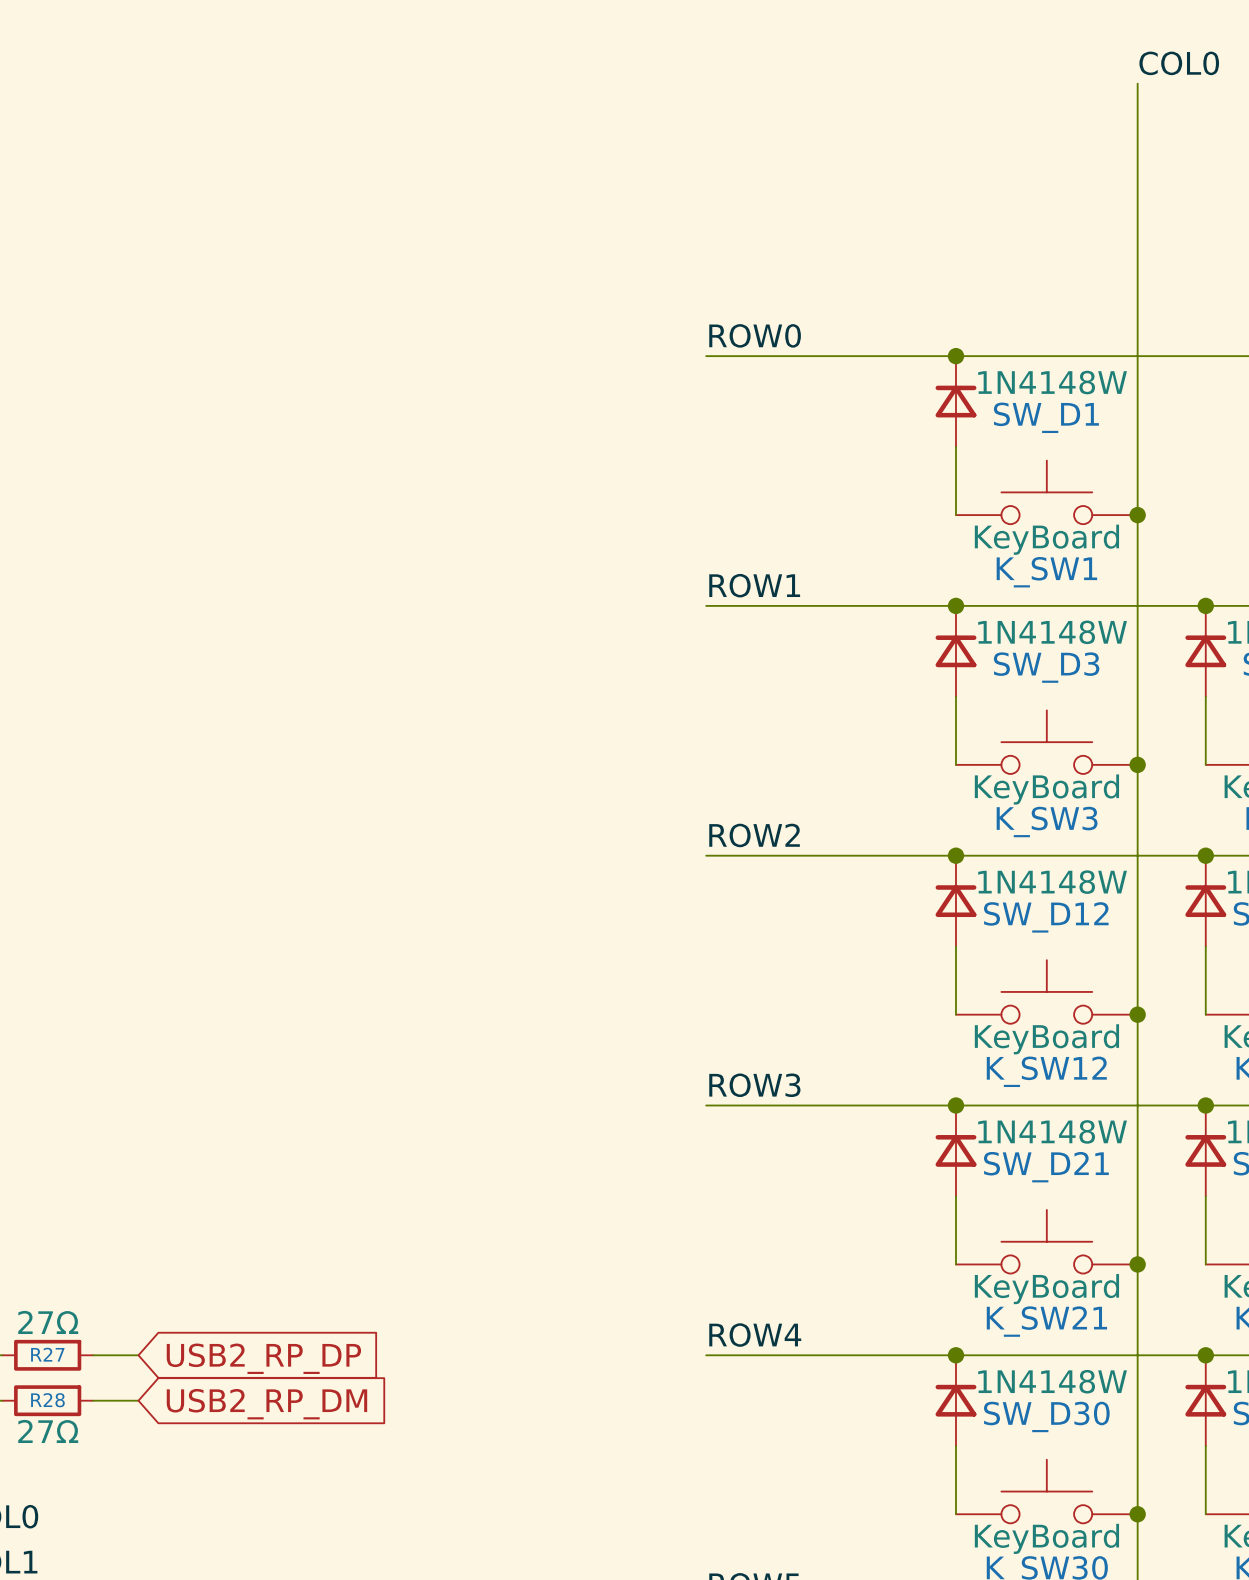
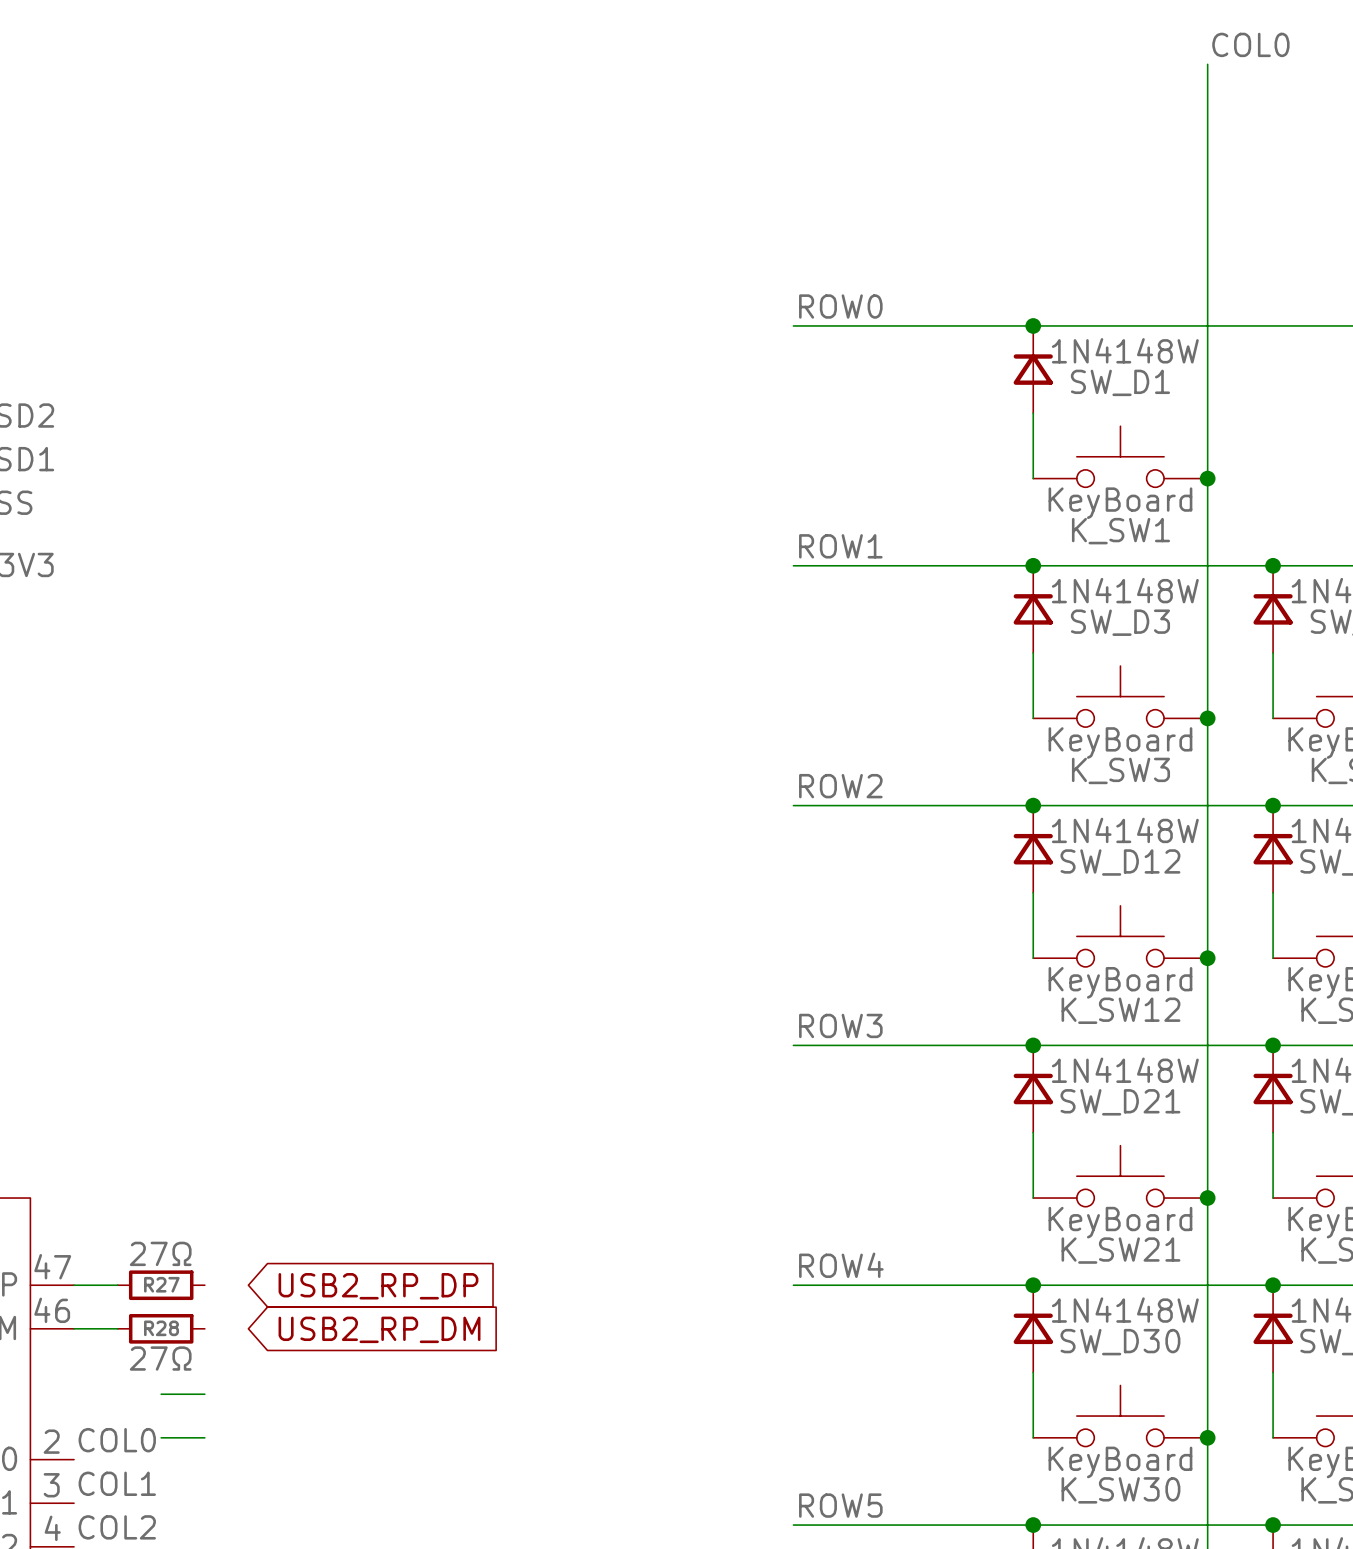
wire: (93, 1355) (138, 1355) -> (161, 1394) (204, 1394)
wire: (93, 1400) (138, 1400) -> (161, 1437) (204, 1437)

